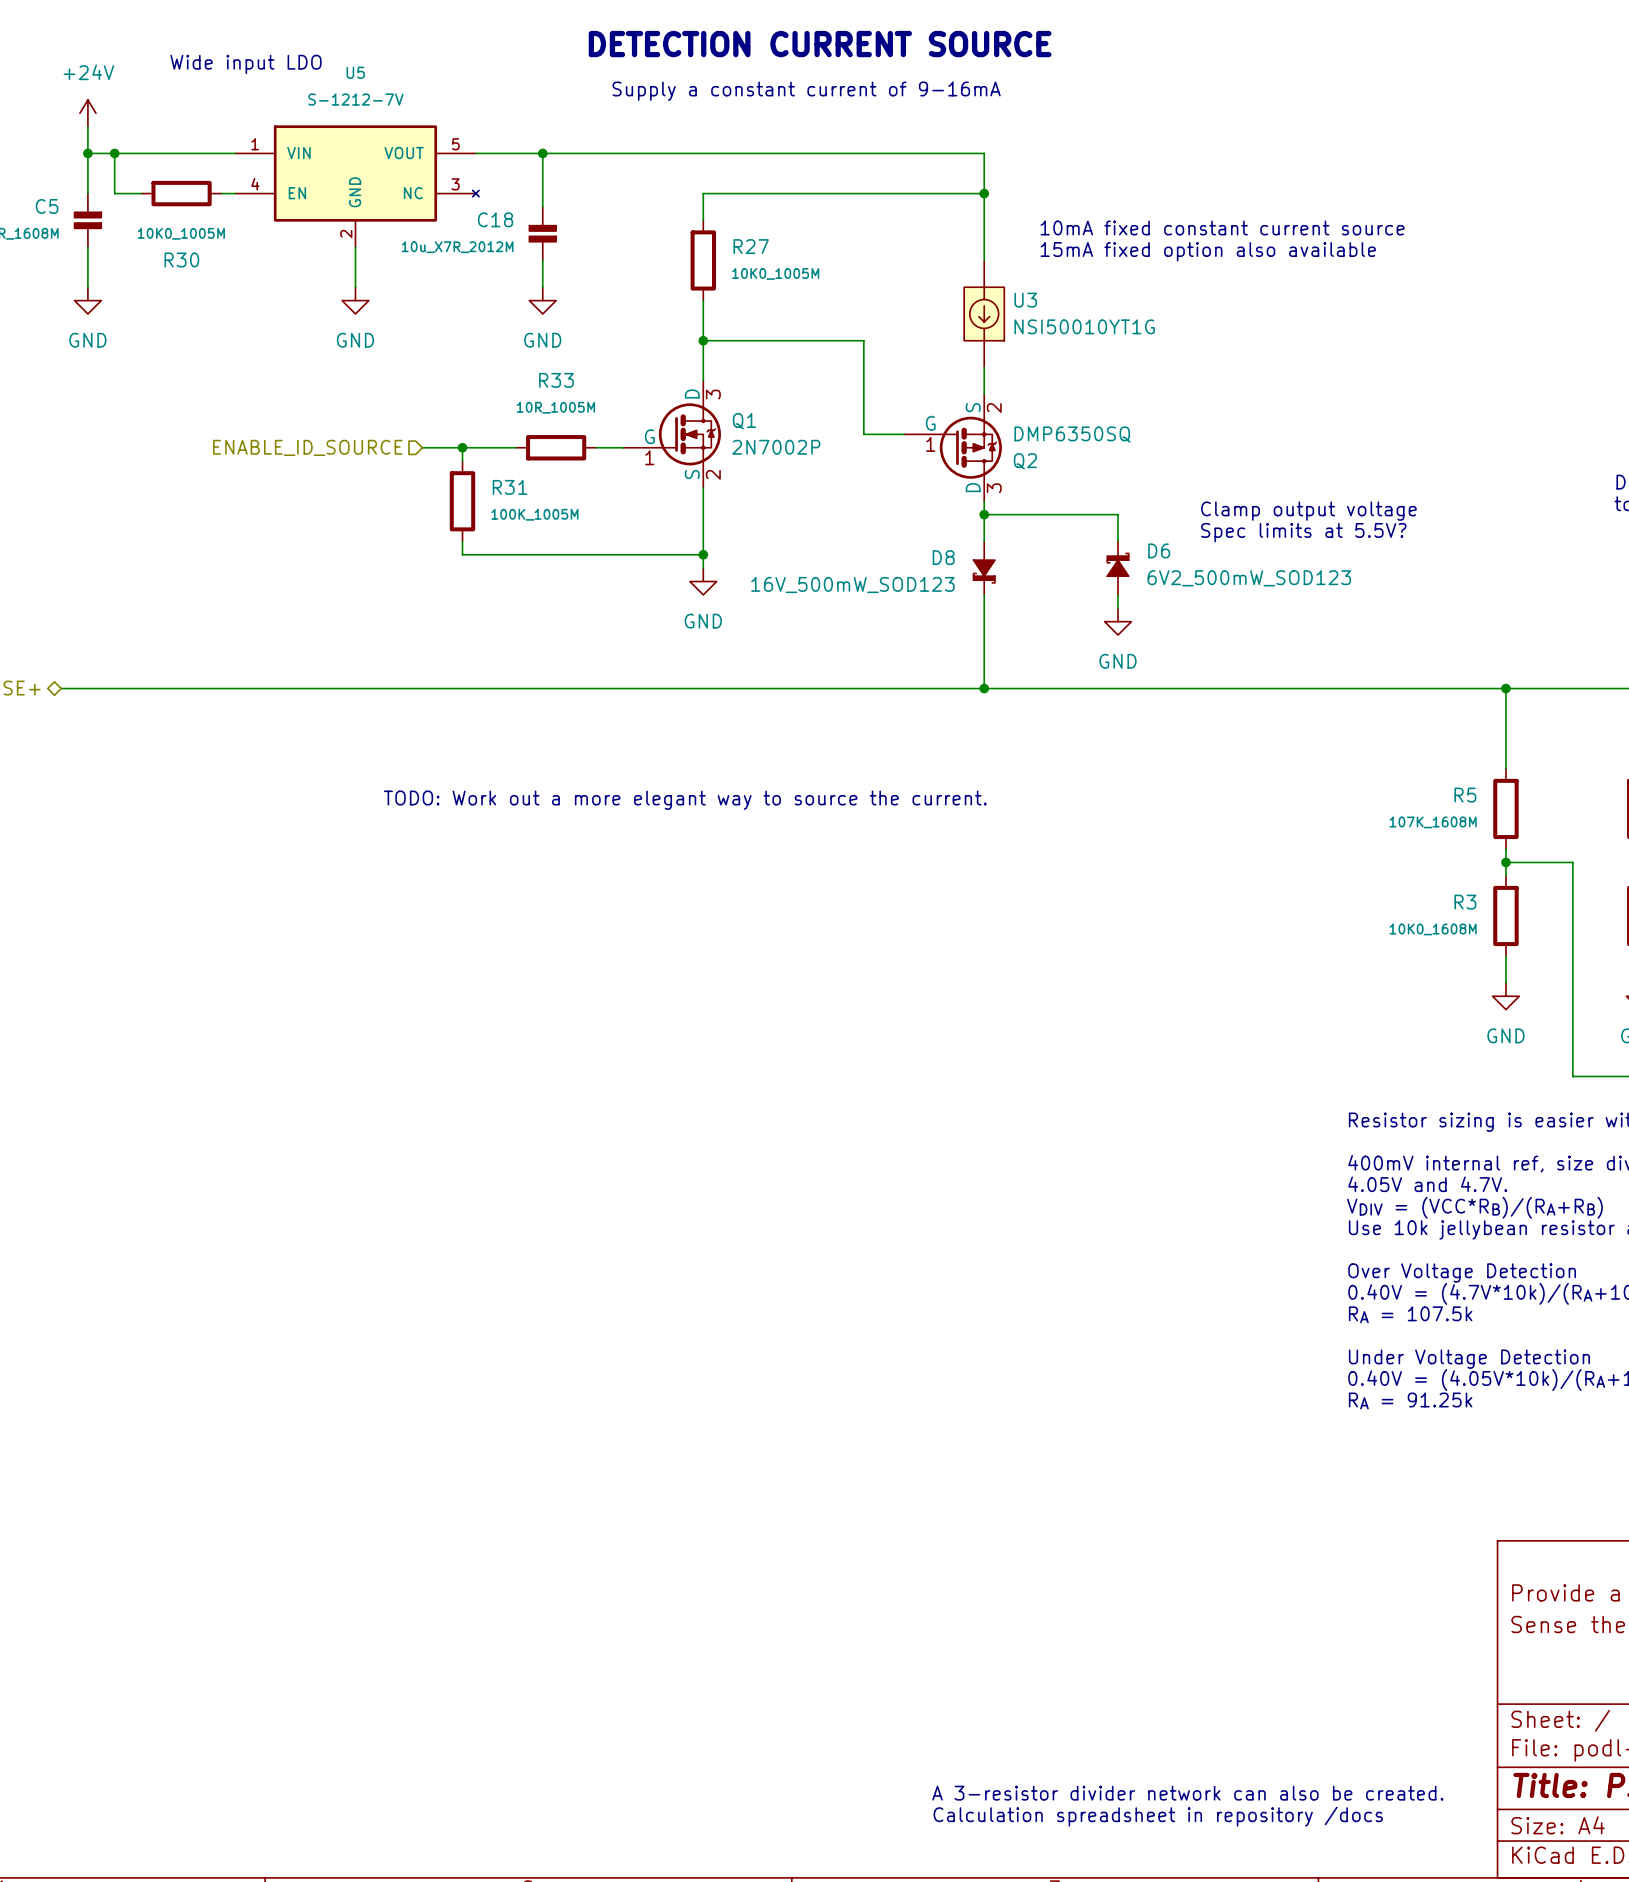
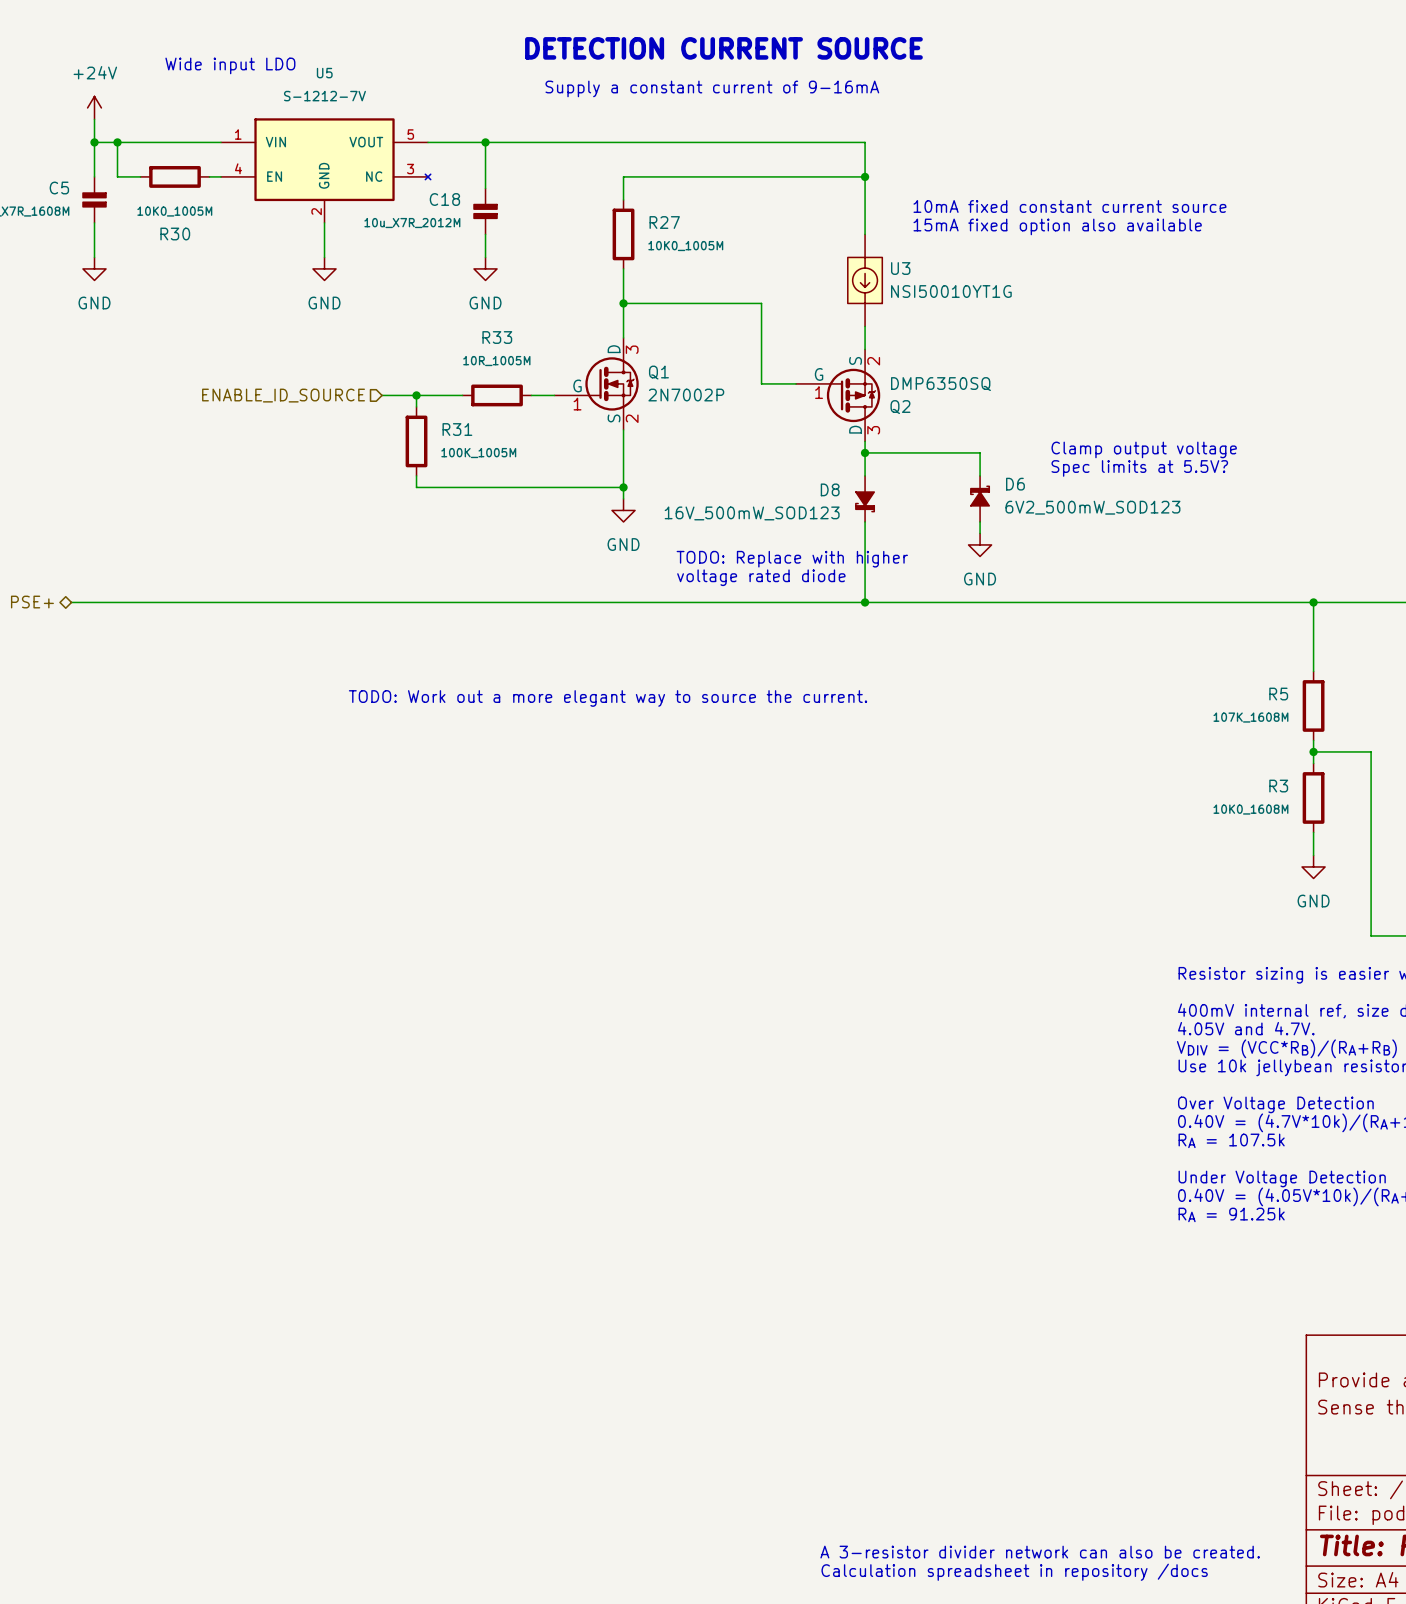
text: none -> TODO: Replace with higher (792, 559)
text: none -> voltage rated diode (761, 577)

